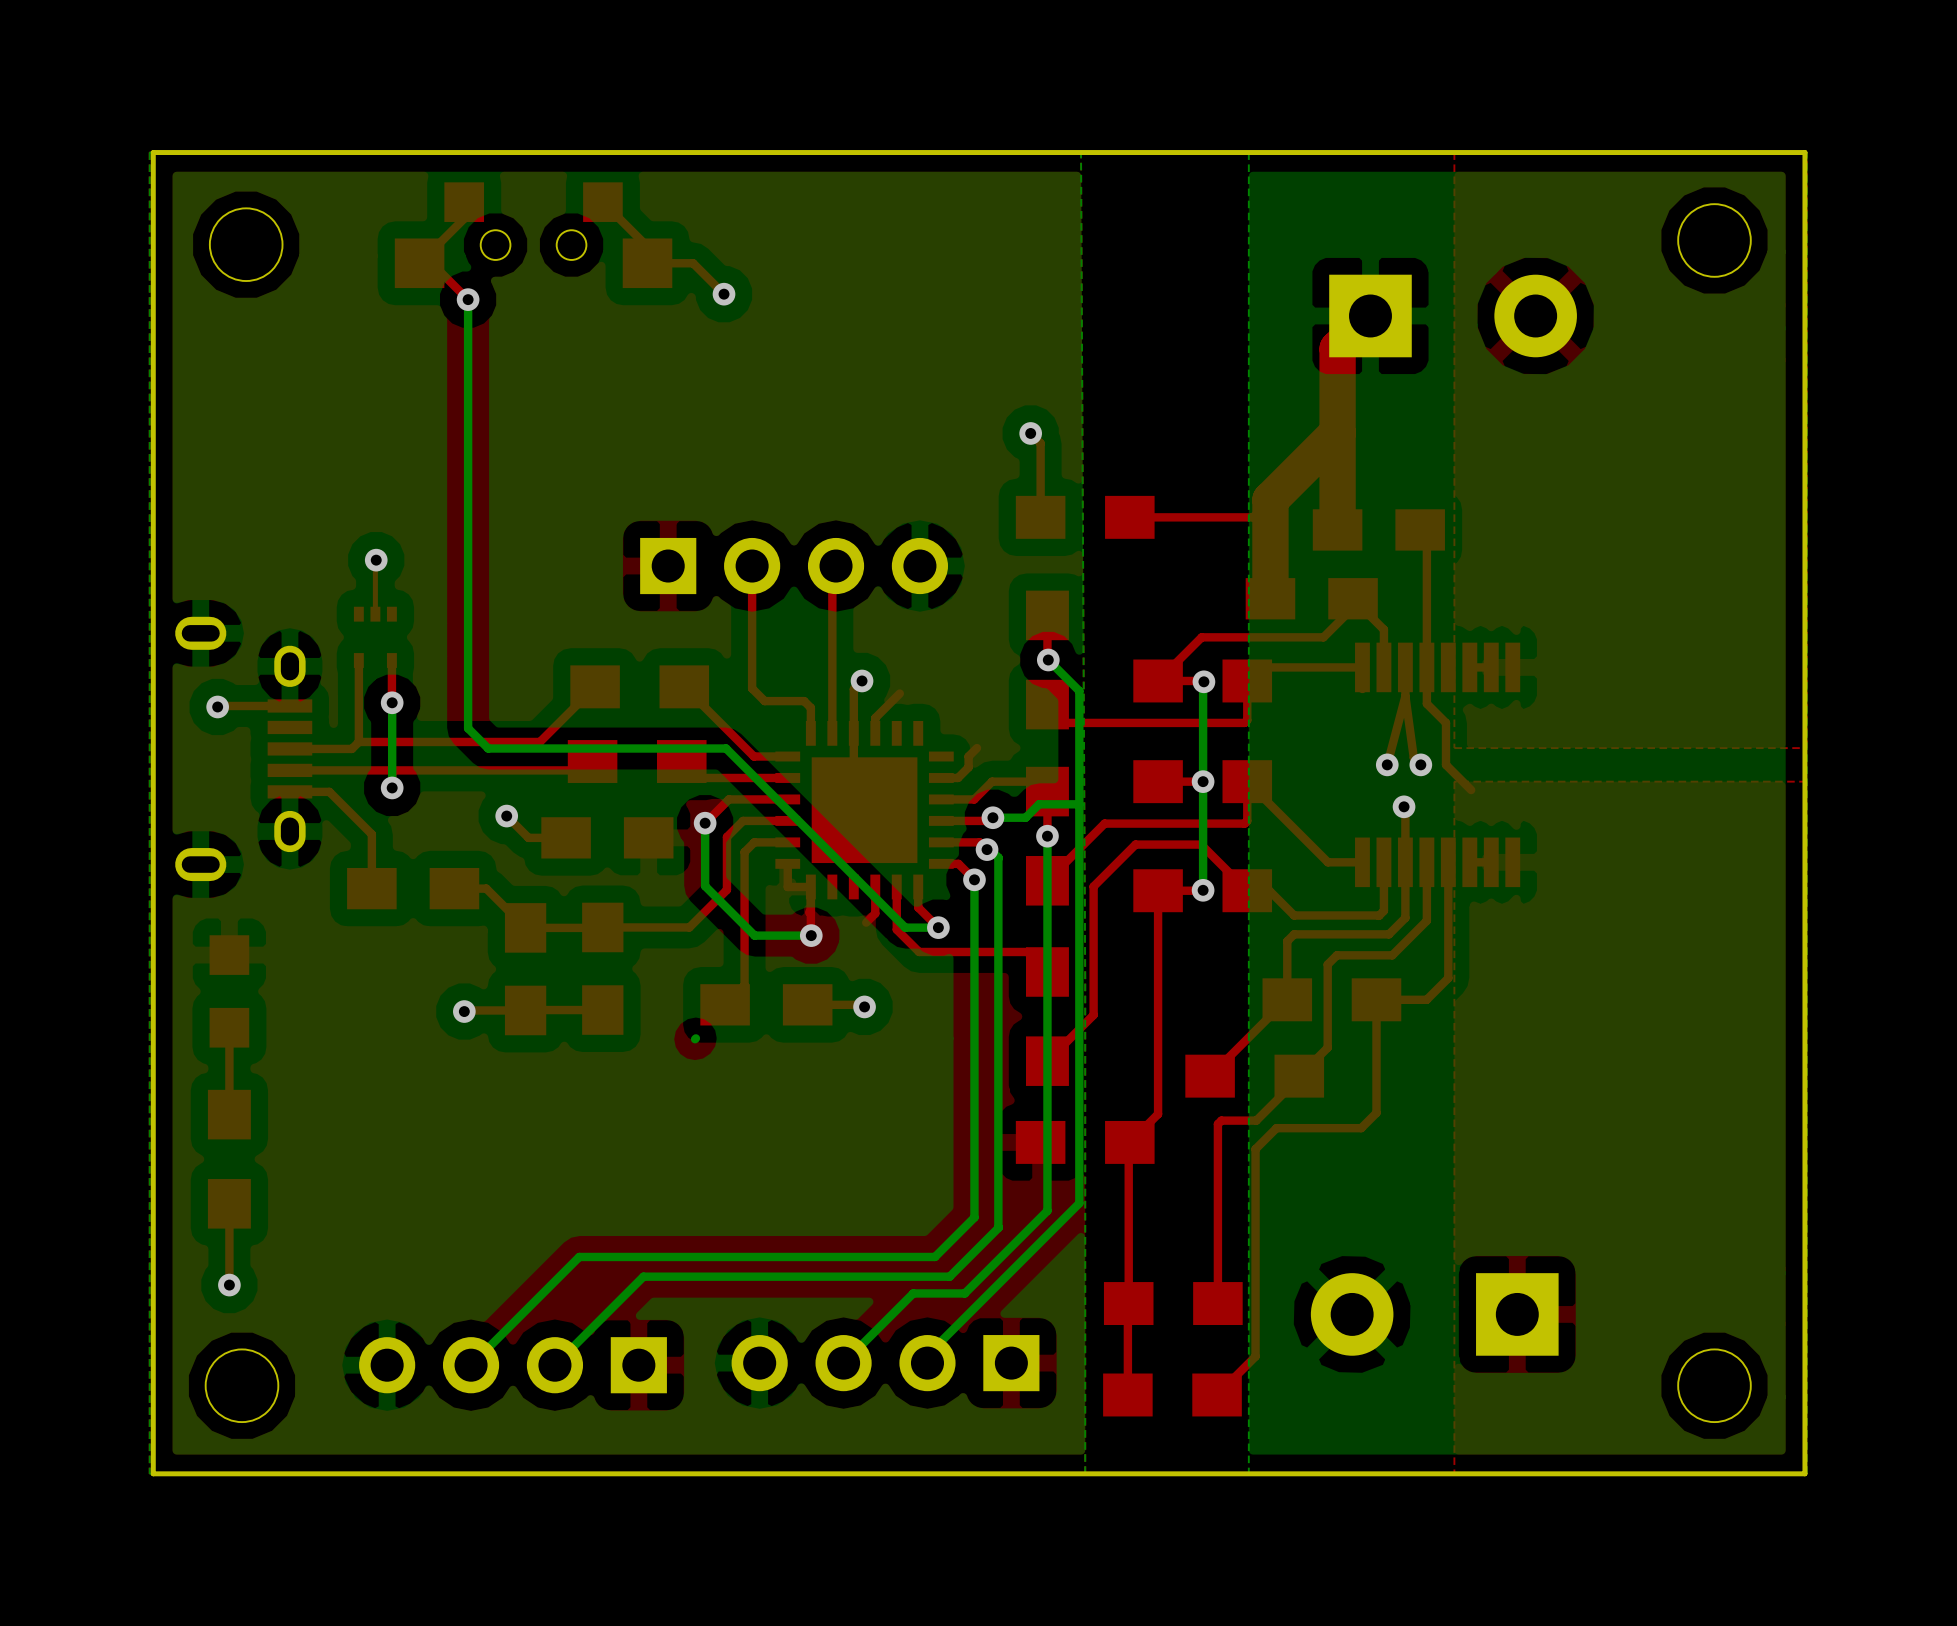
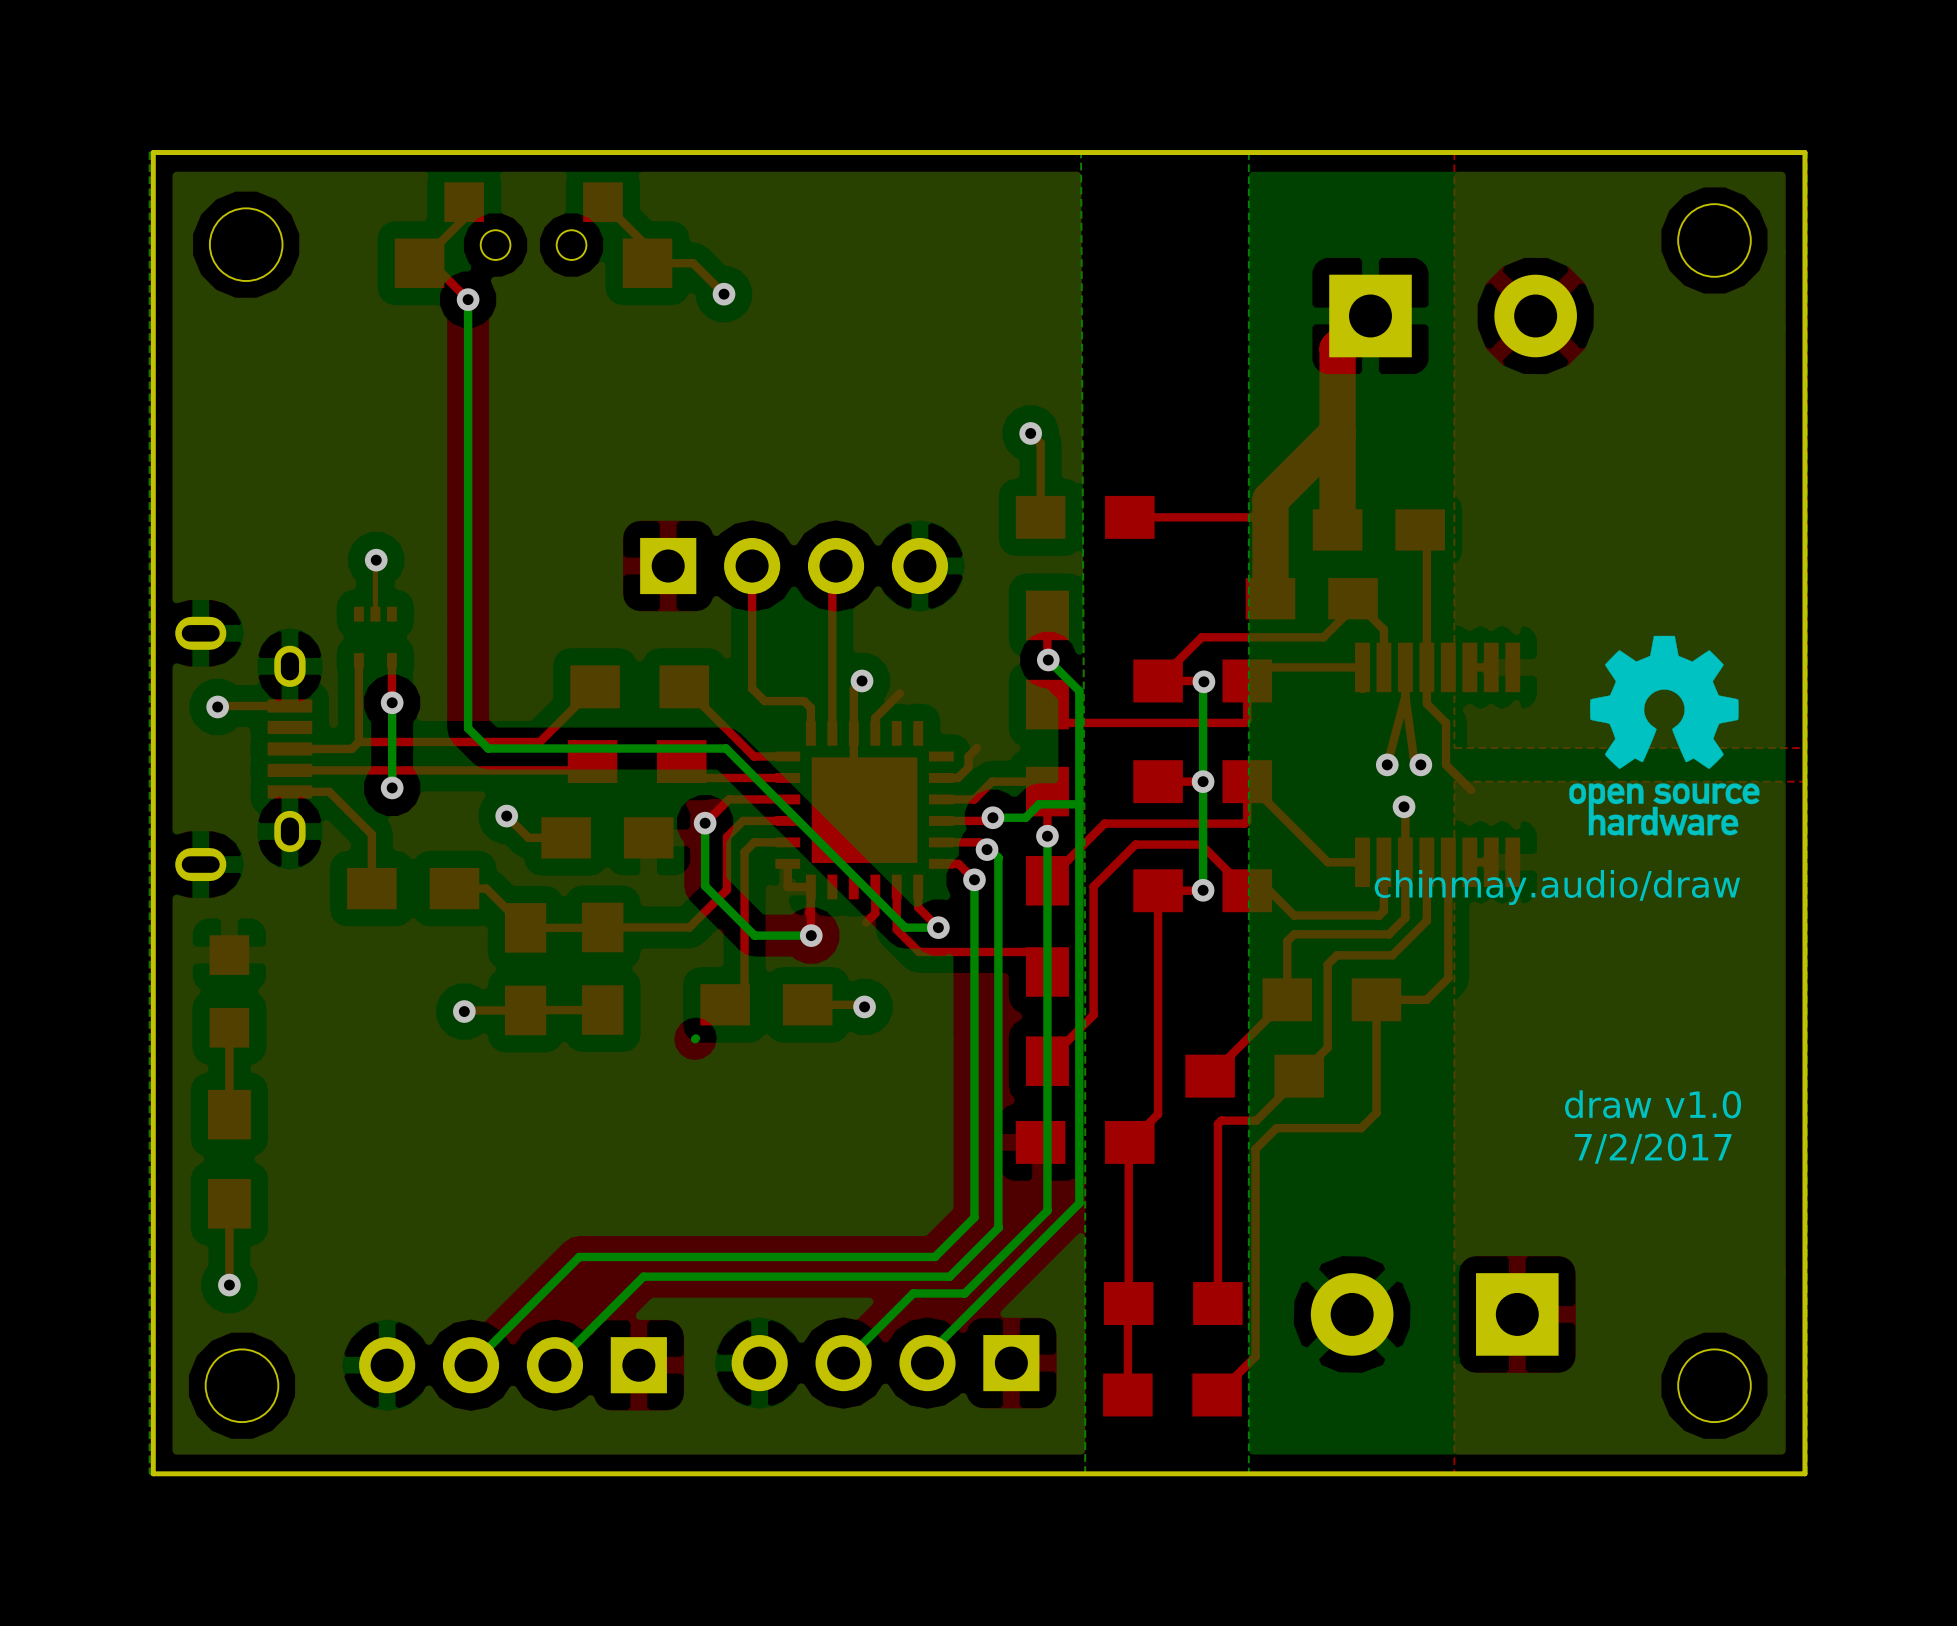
drawing: none -> [1569, 635, 1760, 836]
text: none -> chinmay.audio/draw (1557, 887)
text: none -> draw v1.0 (1653, 1104)
text: none -> 7/2/2017 (1653, 1148)

